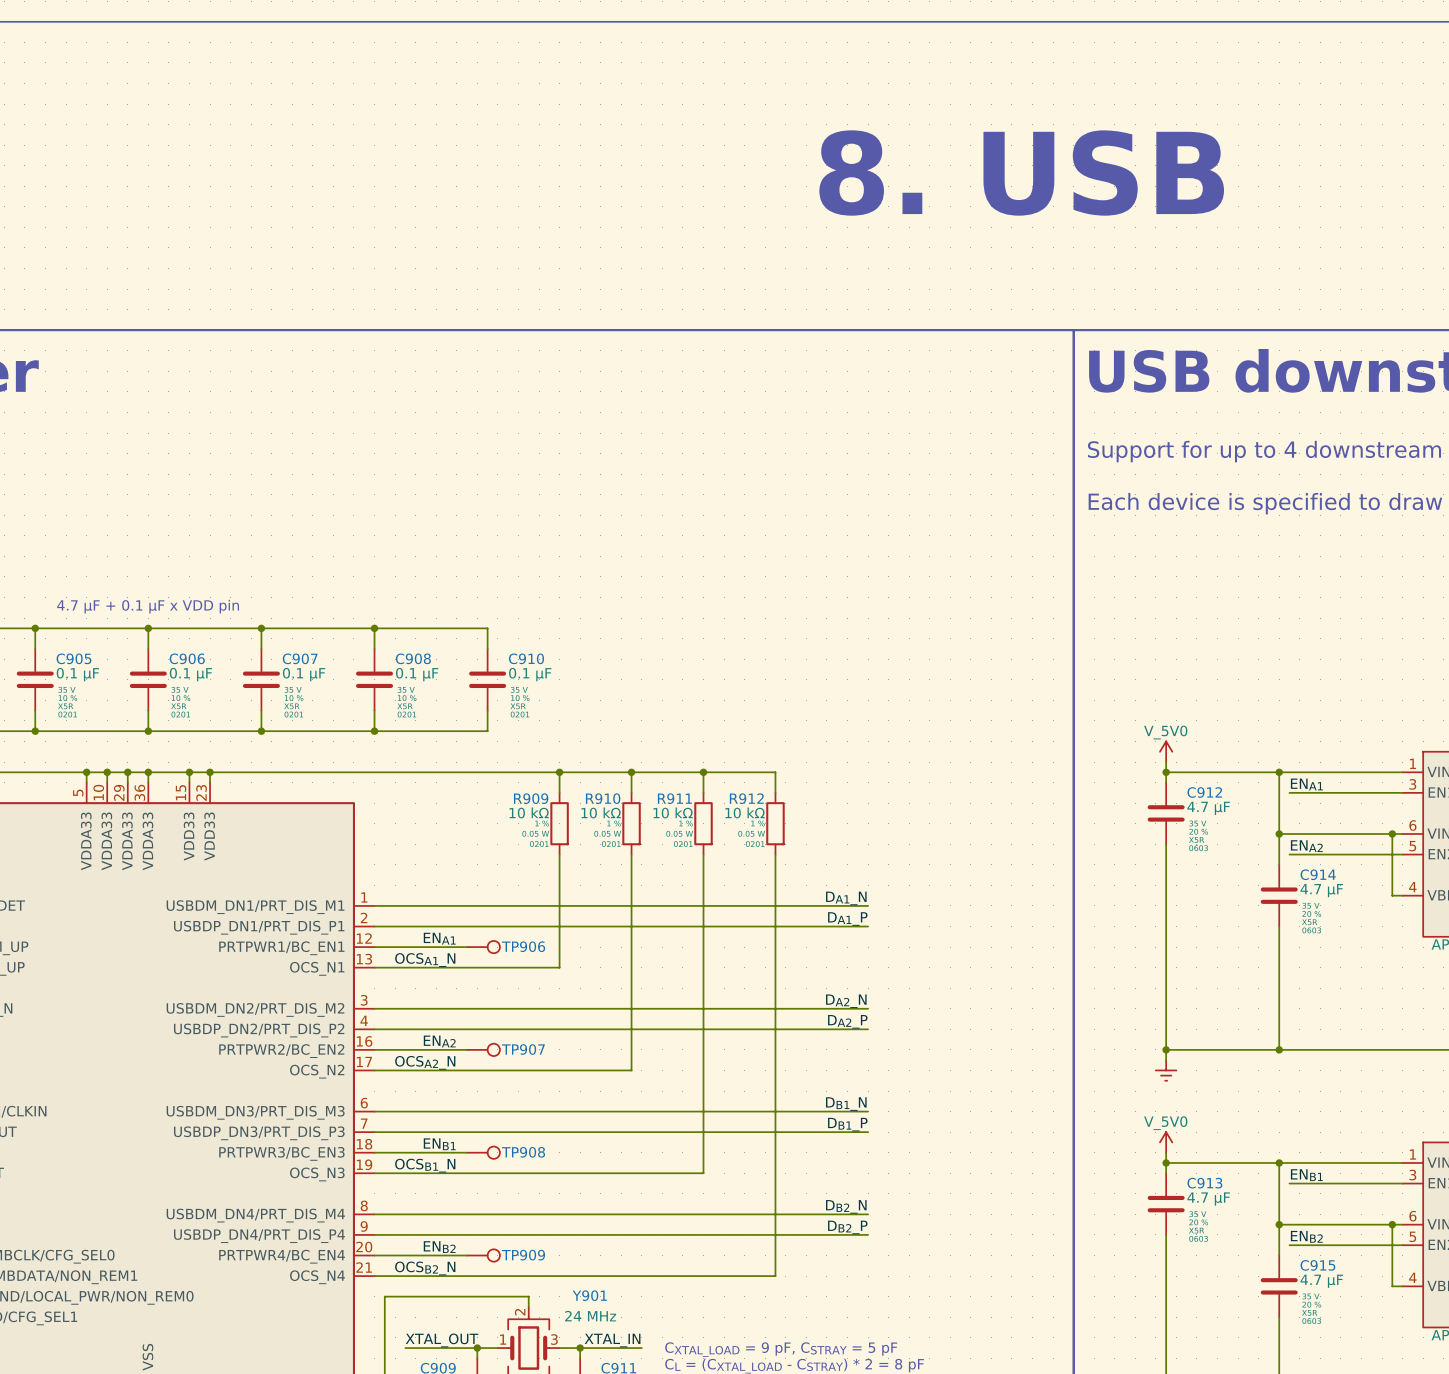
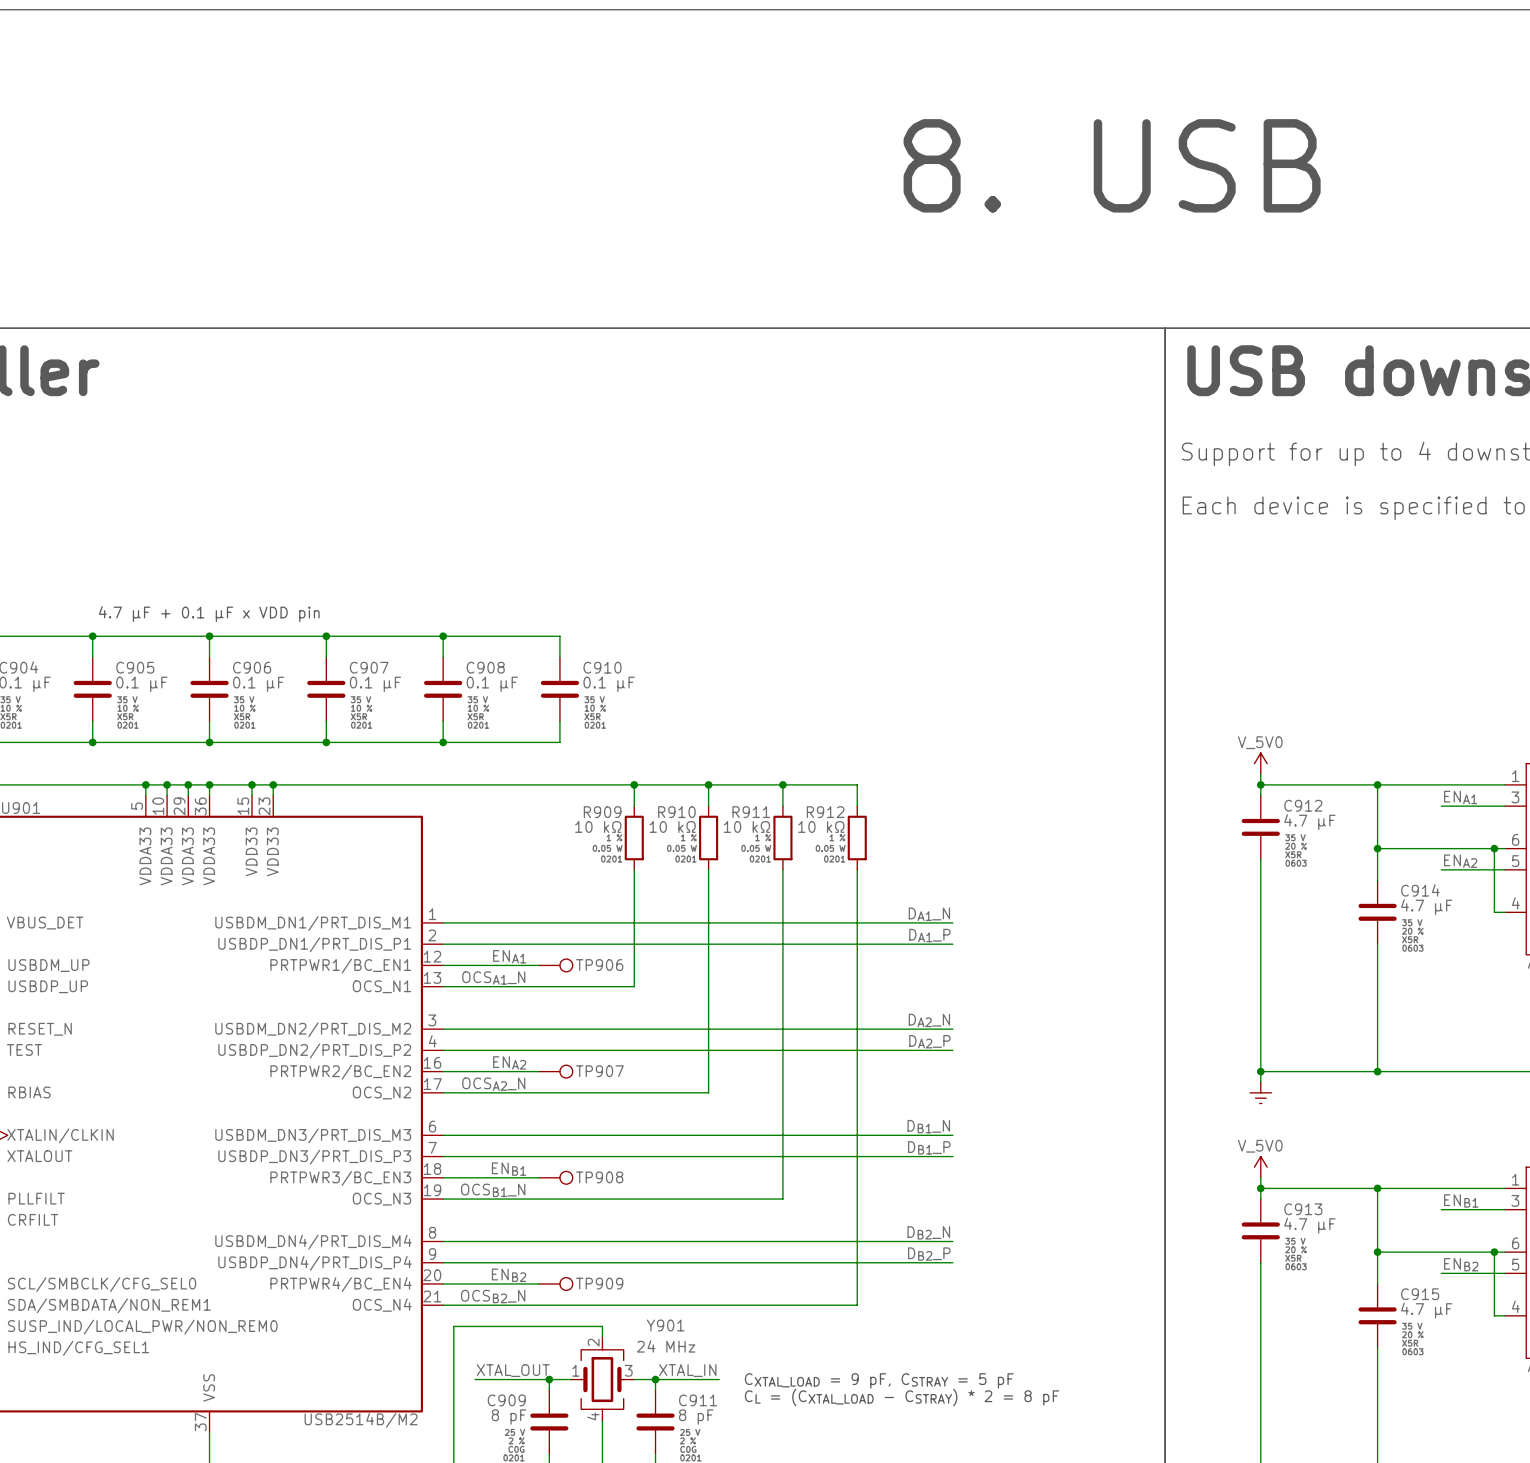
label position: ENA1 (1306, 784) -> ENA1 (1460, 797)
wire: (1289, 792) (1340, 792) -> none
label position: ENA2 (1306, 846) -> ENA2 (1460, 861)
wire: (1289, 854) (1340, 854) -> none
label position: ENB1 (1306, 1175) -> ENB1 (1461, 1200)
wire: (1289, 1183) (1340, 1183) -> none
label position: ENB2 (1306, 1236) -> ENB2 (1461, 1264)
wire: (1289, 1245) (1340, 1245) -> none

